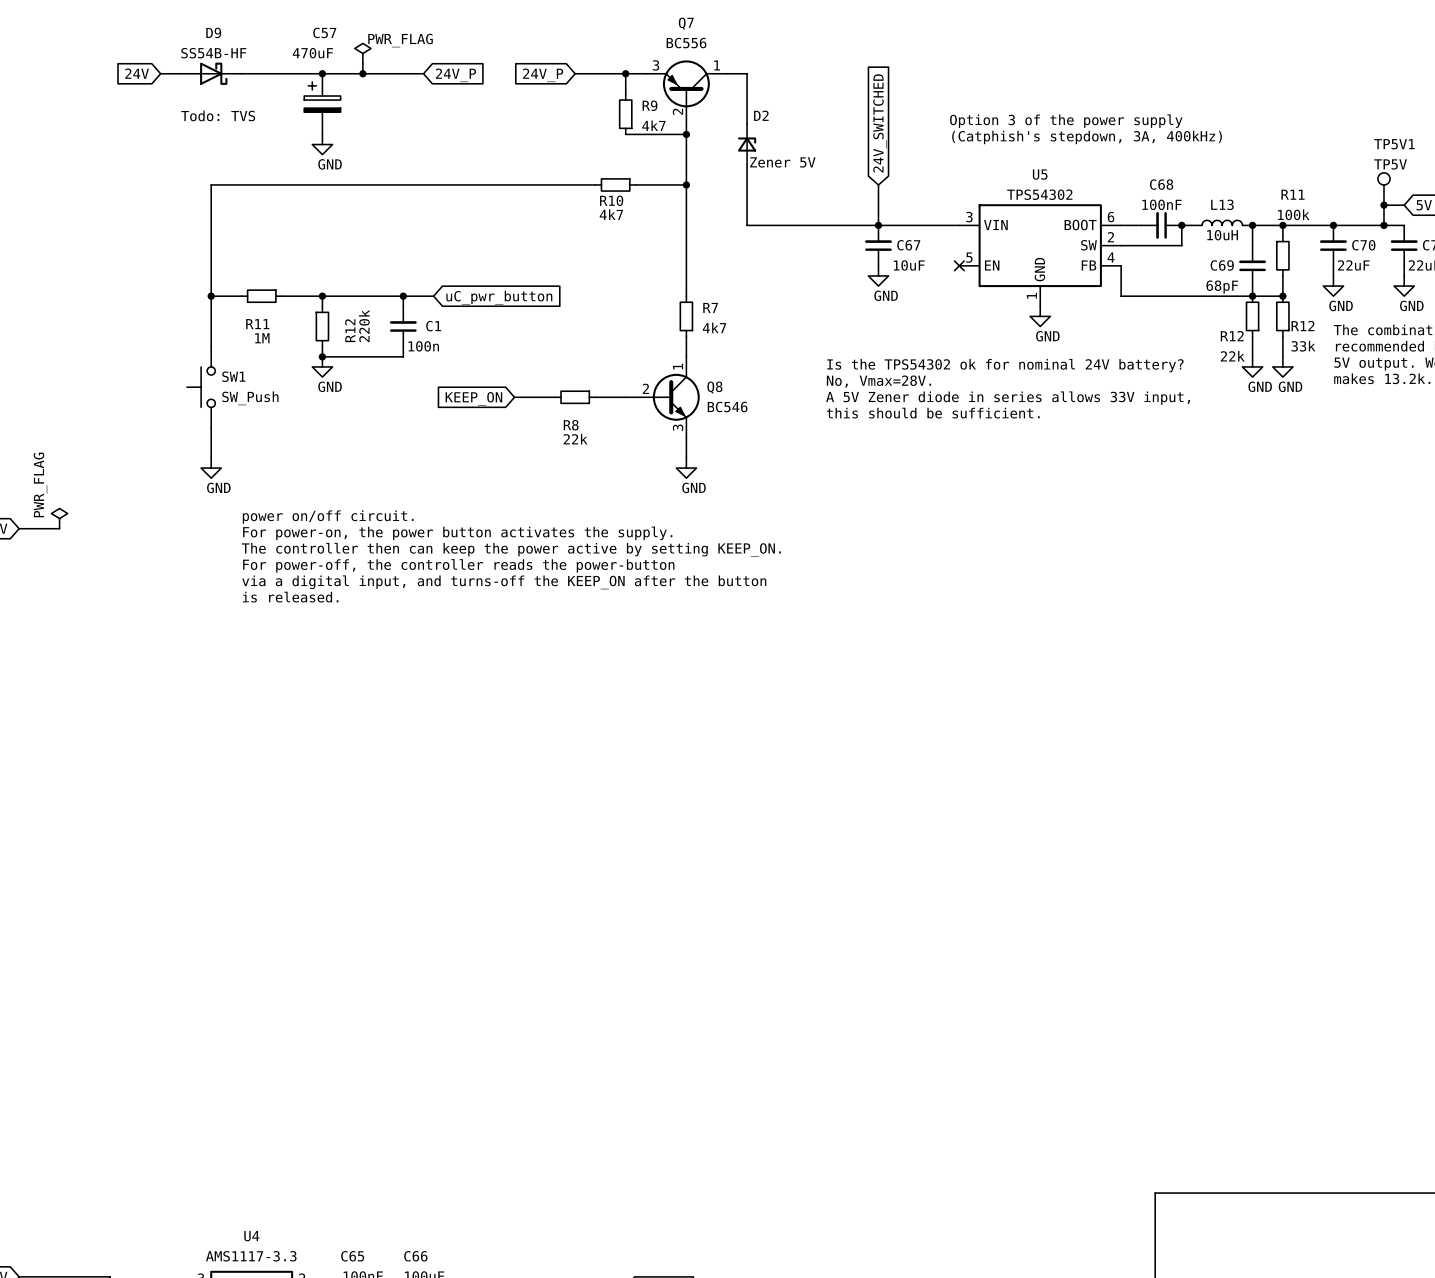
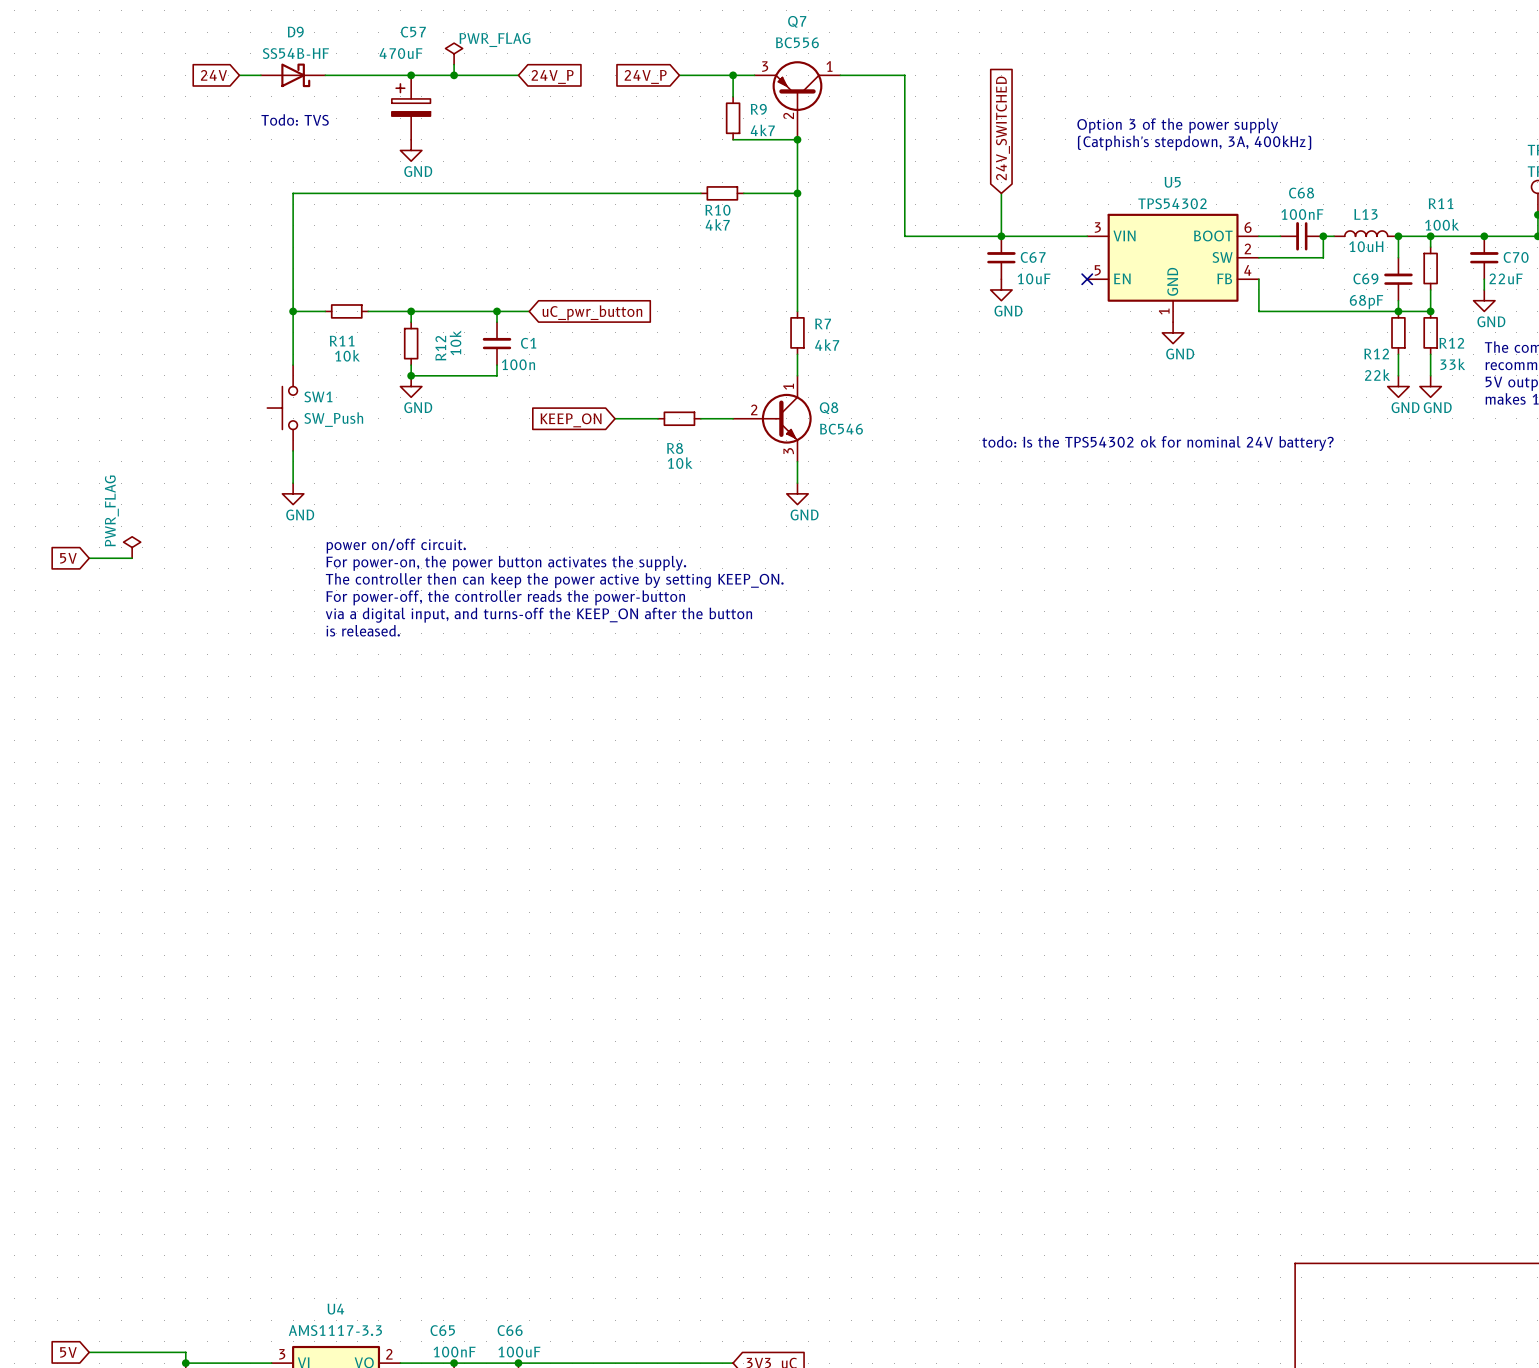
wire: (747, 73) (747, 124) -> none
D2: Zener 5V (747, 144) -> none
wire: (747, 164) (747, 225) (787, 225) -> (861, 75) (904, 75) (904, 236)
R12 value: 220k (364, 326) -> 10k (455, 342)
R11 value: 1M (262, 338) -> 10k (347, 355)
text: Is the TPS54302 ok for nominal 24V battery? (1005, 365) -> none
text: No, Vmax=28V. (878, 381) -> none
text: A 5V Zener diode in series allows 33V input, (1008, 398) -> none
text: this should be sufficient. (933, 413) -> none
text: none -> todo: Is the TPS54302 ok for nominal 24V battery? (1158, 443)
R8 value: 22k (575, 439) -> 10k (680, 463)

